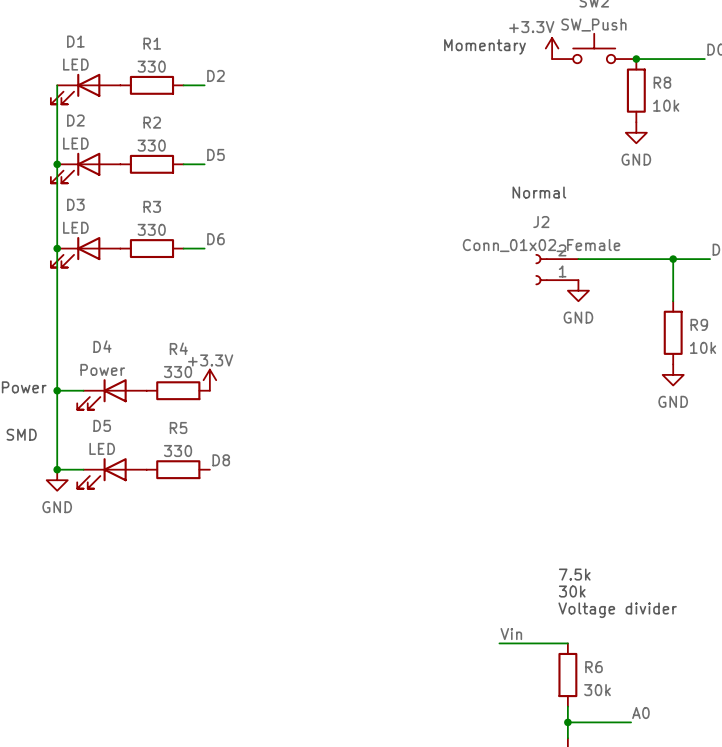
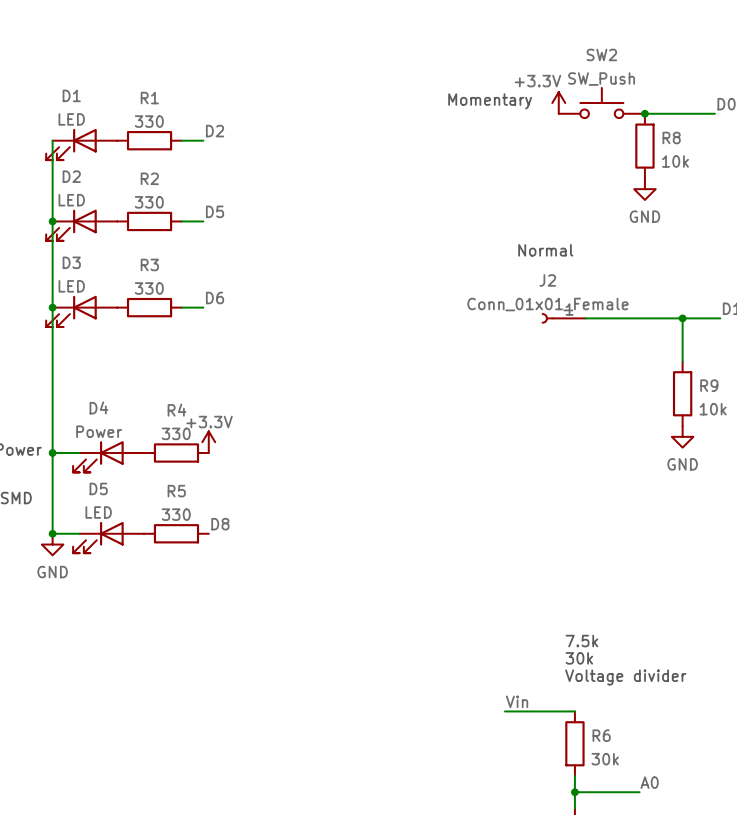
J2 value: Conn_01x02_Female (541, 245) -> Conn_01x01_Female (548, 304)
J2 symbol: [535, 254, 579, 286] -> [541, 313, 586, 324]
power symbol: GND (578, 290) -> none

